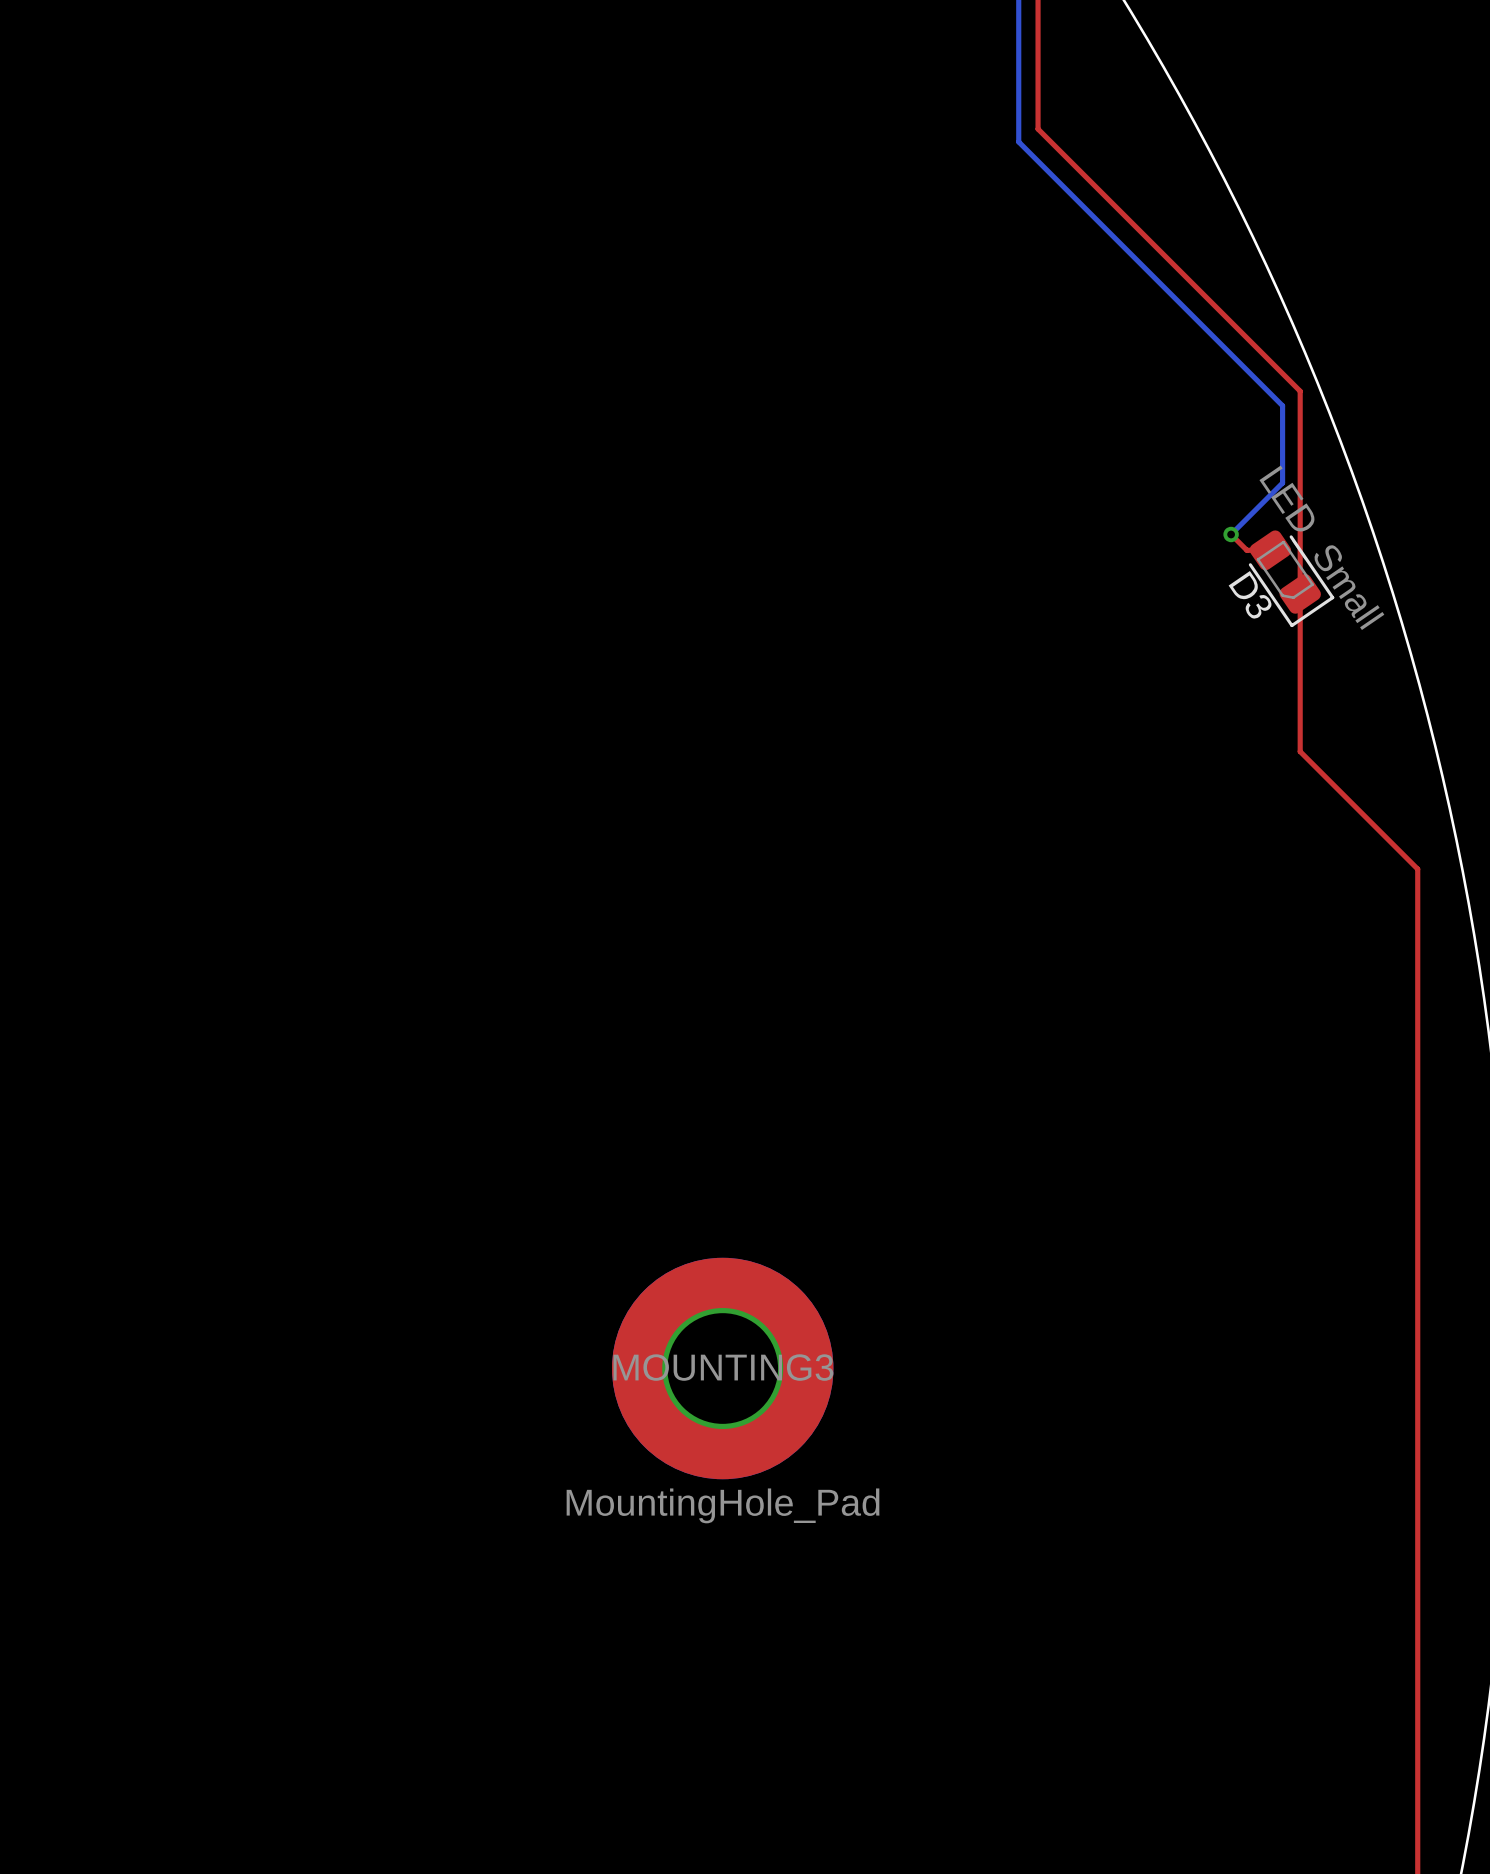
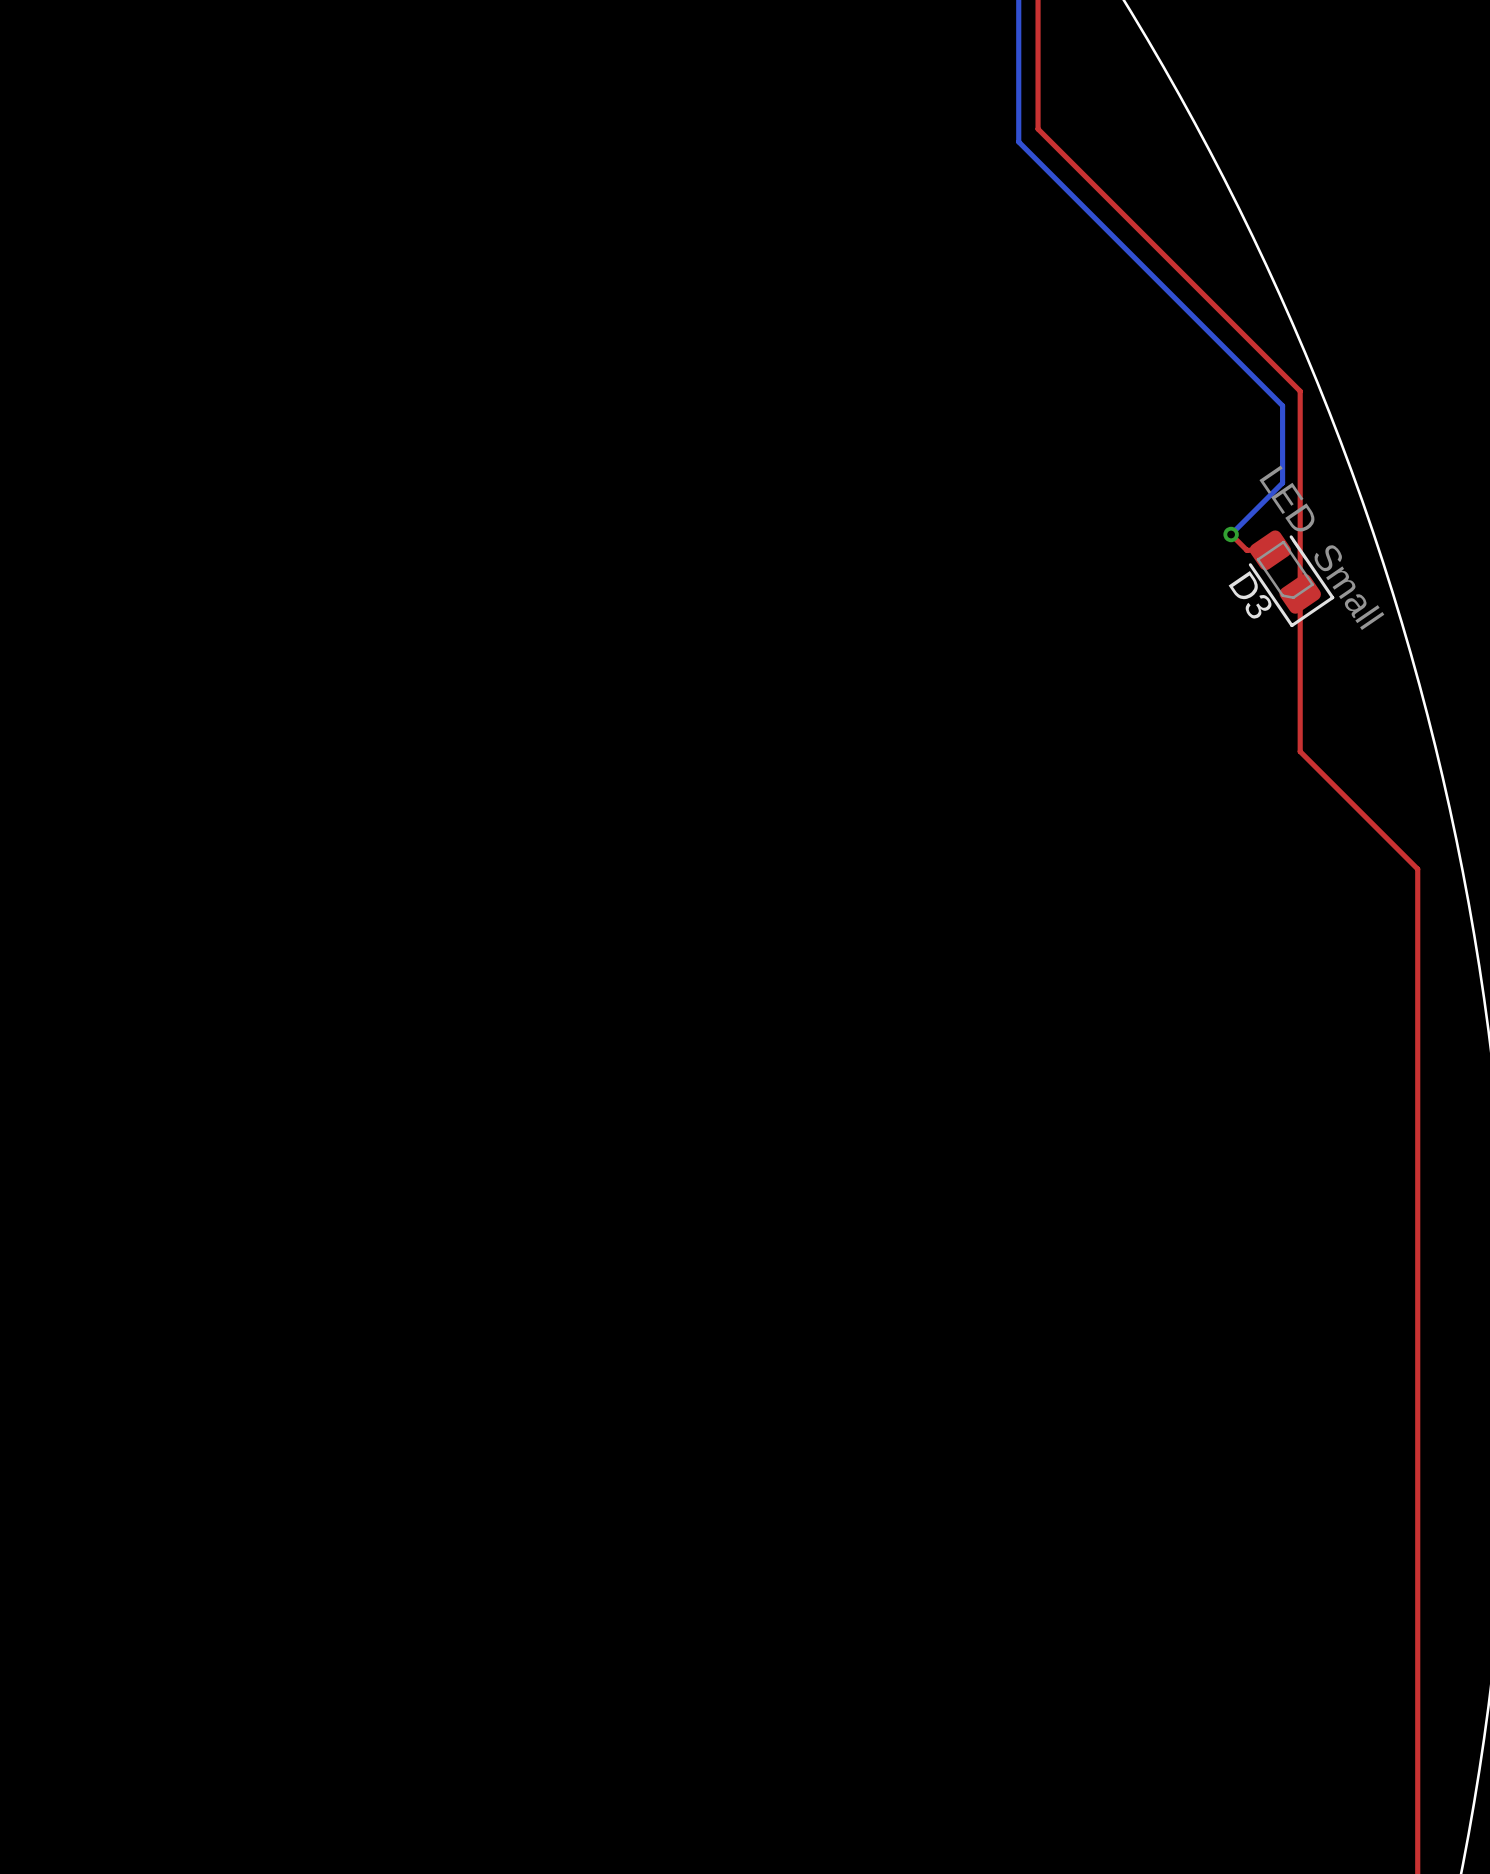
MOUNTING3: MountingHole_Pad (722, 1368) -> none

